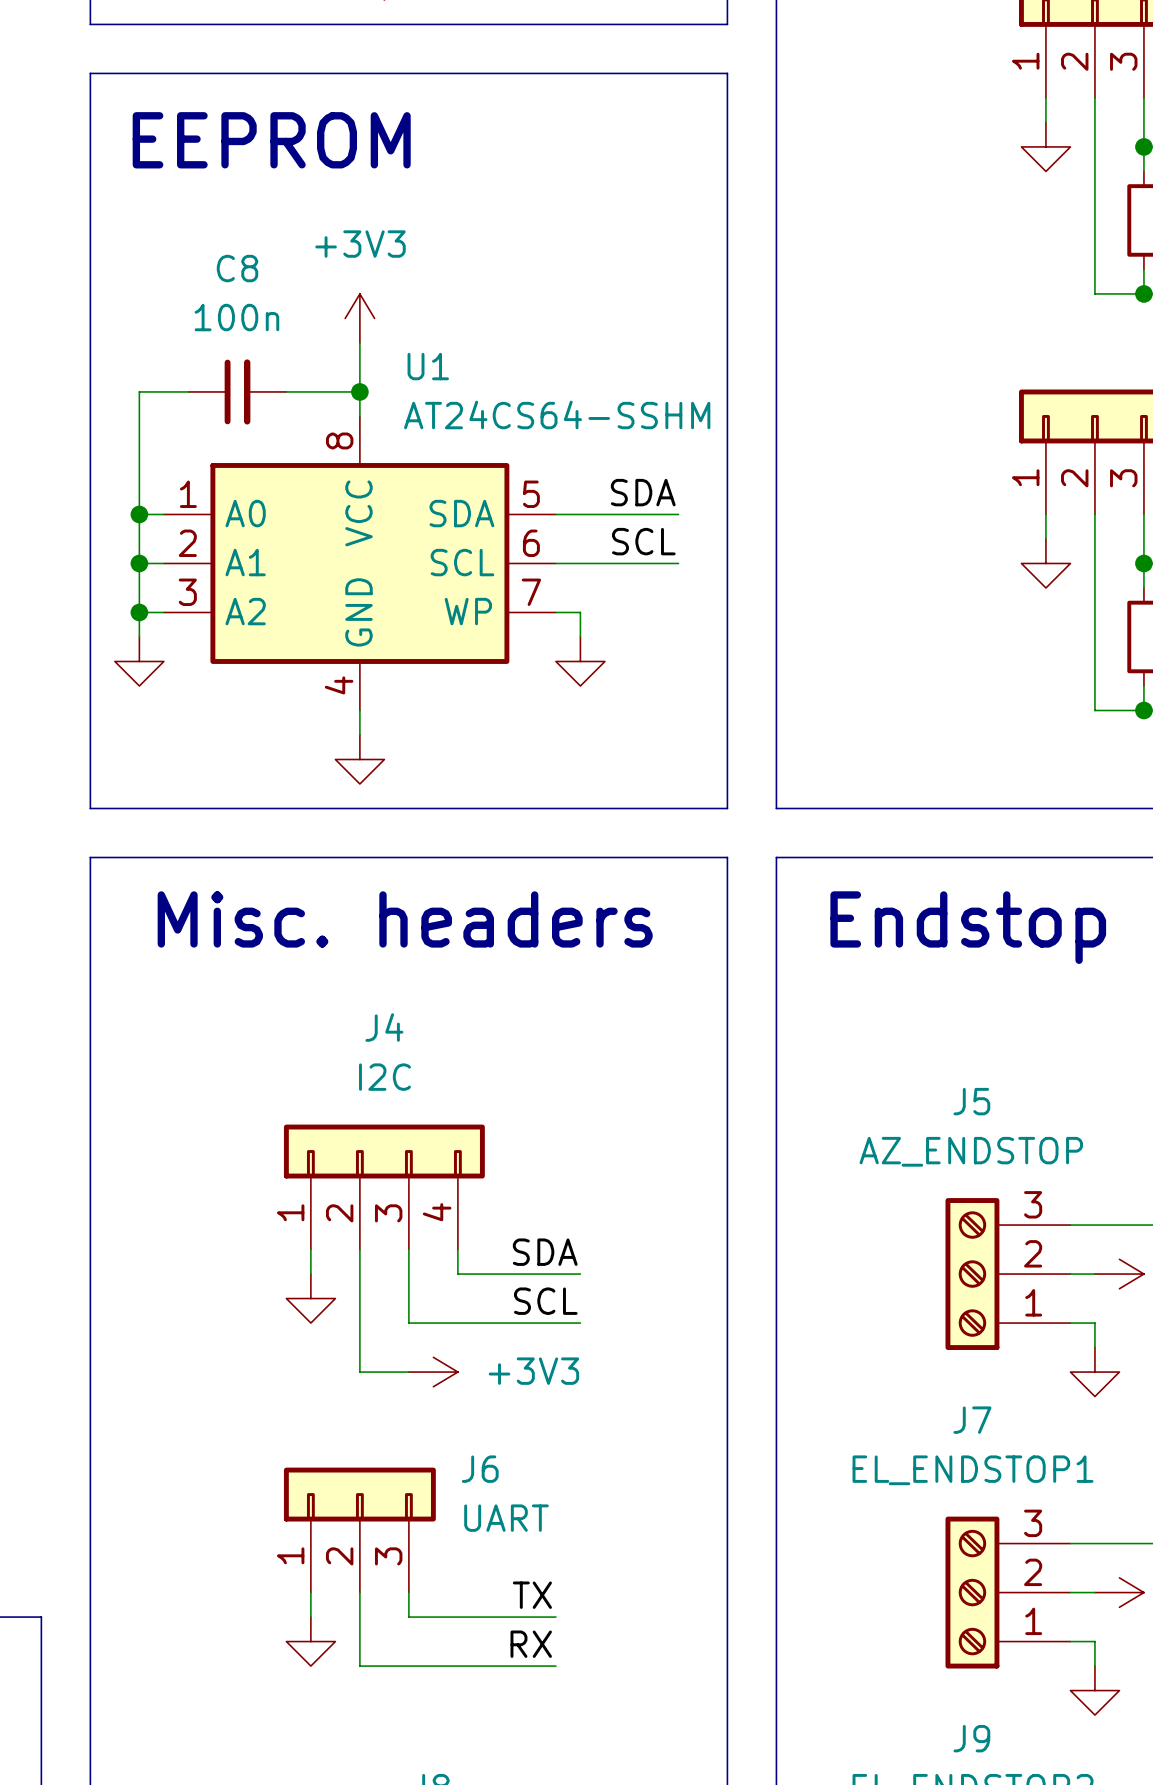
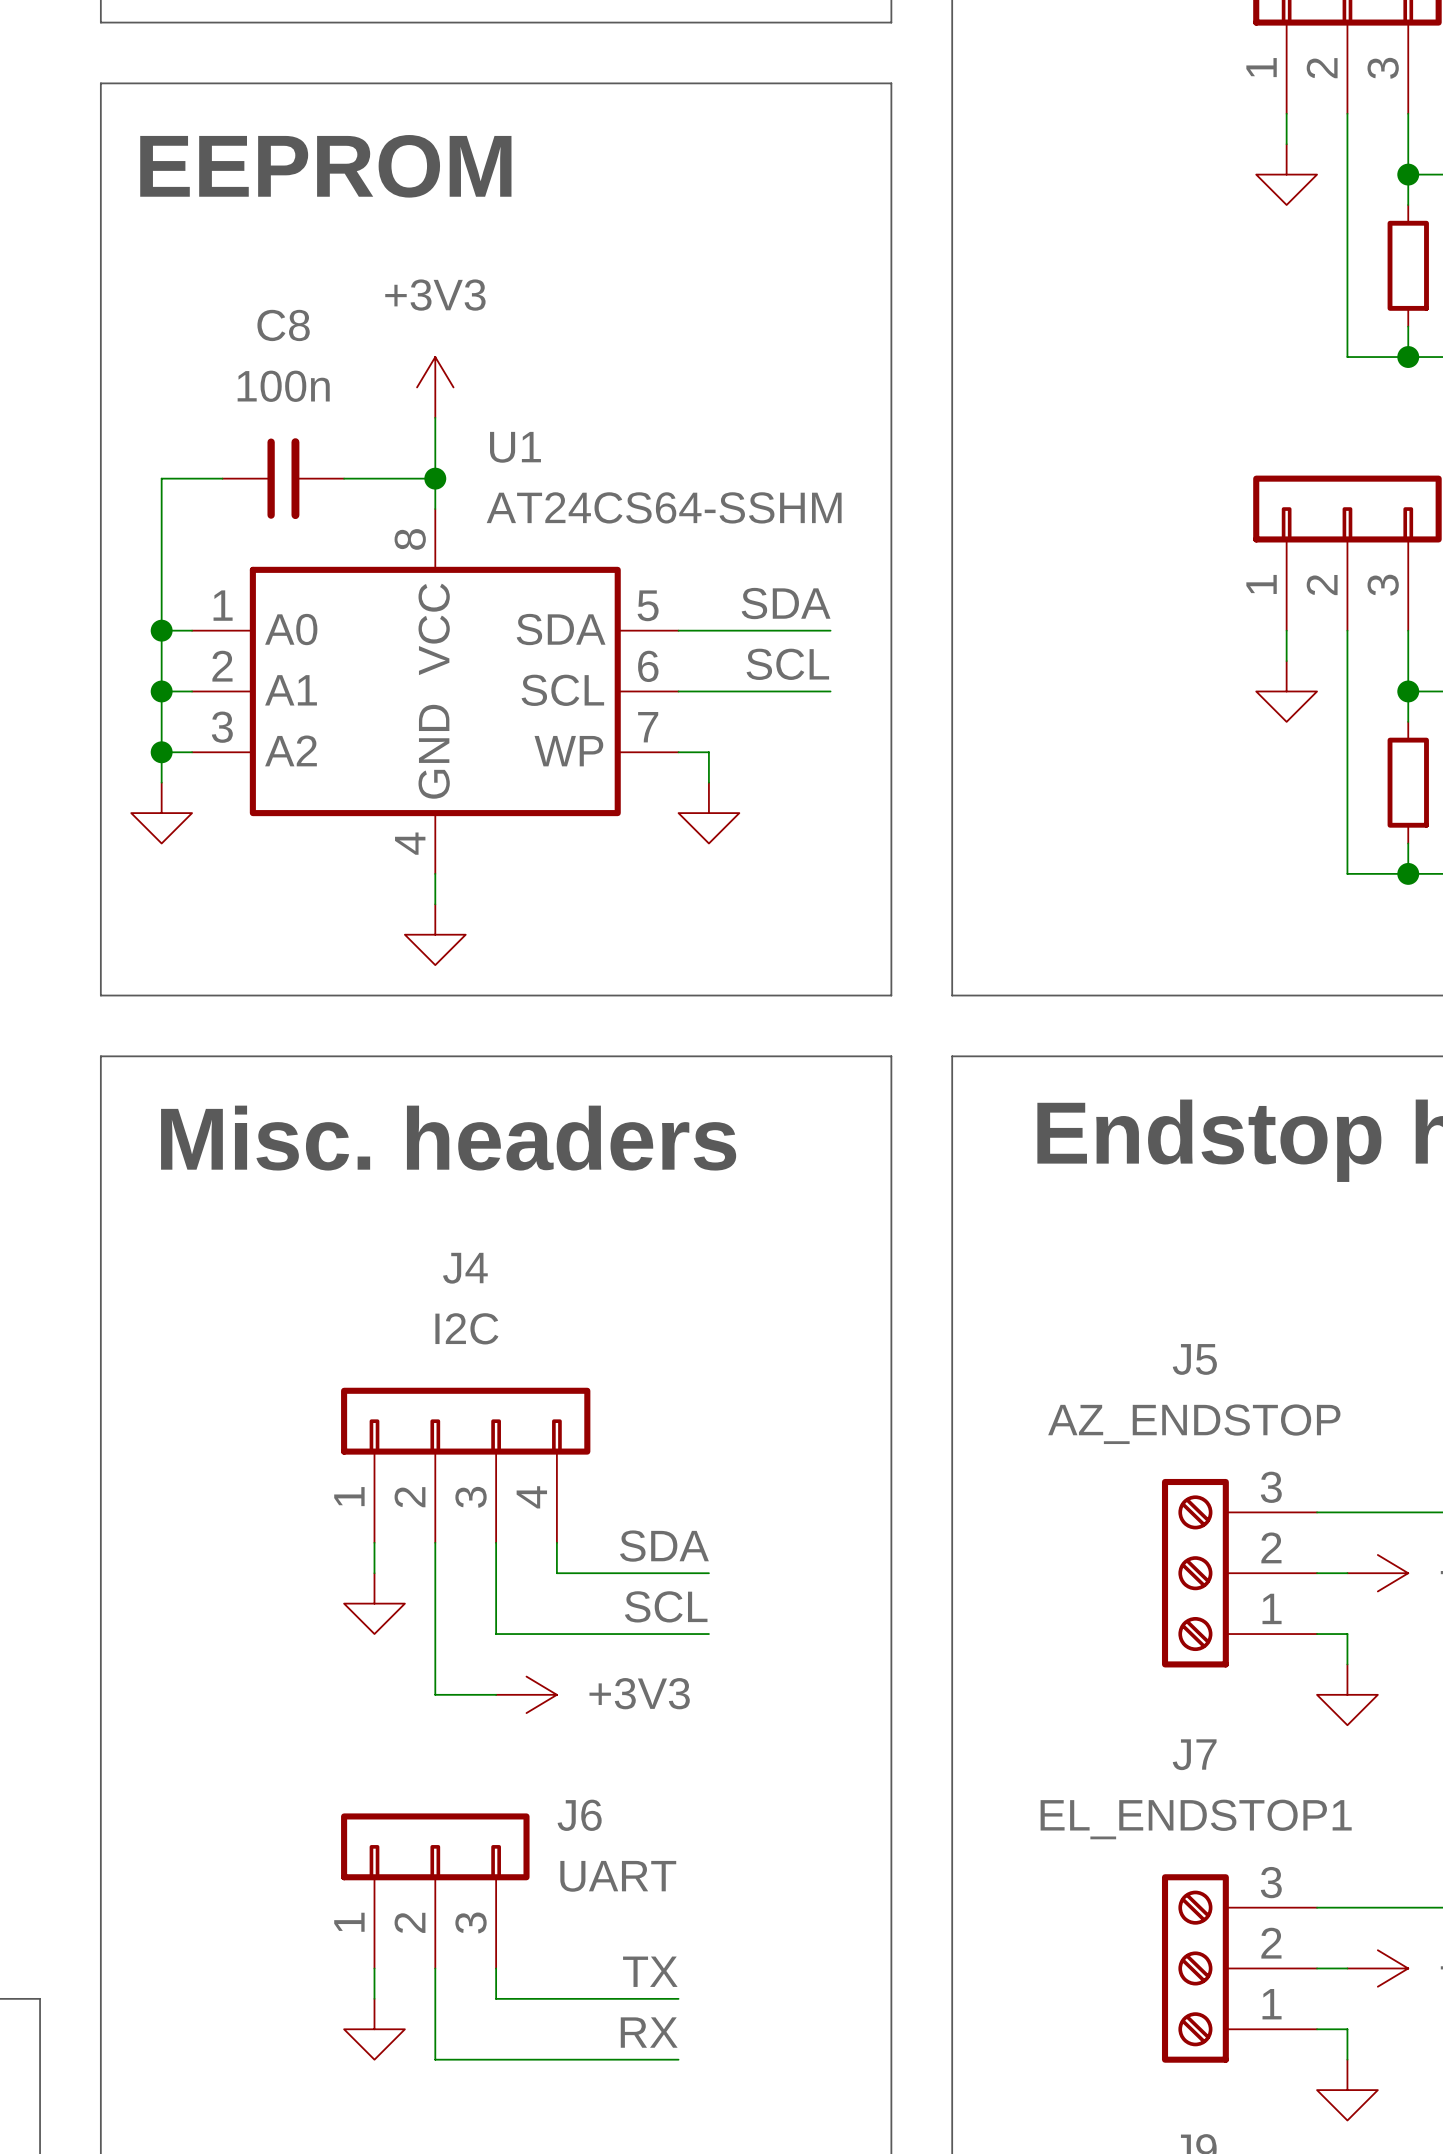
text position: Misc. headers (405, 919) -> Misc. headers (448, 1138)

